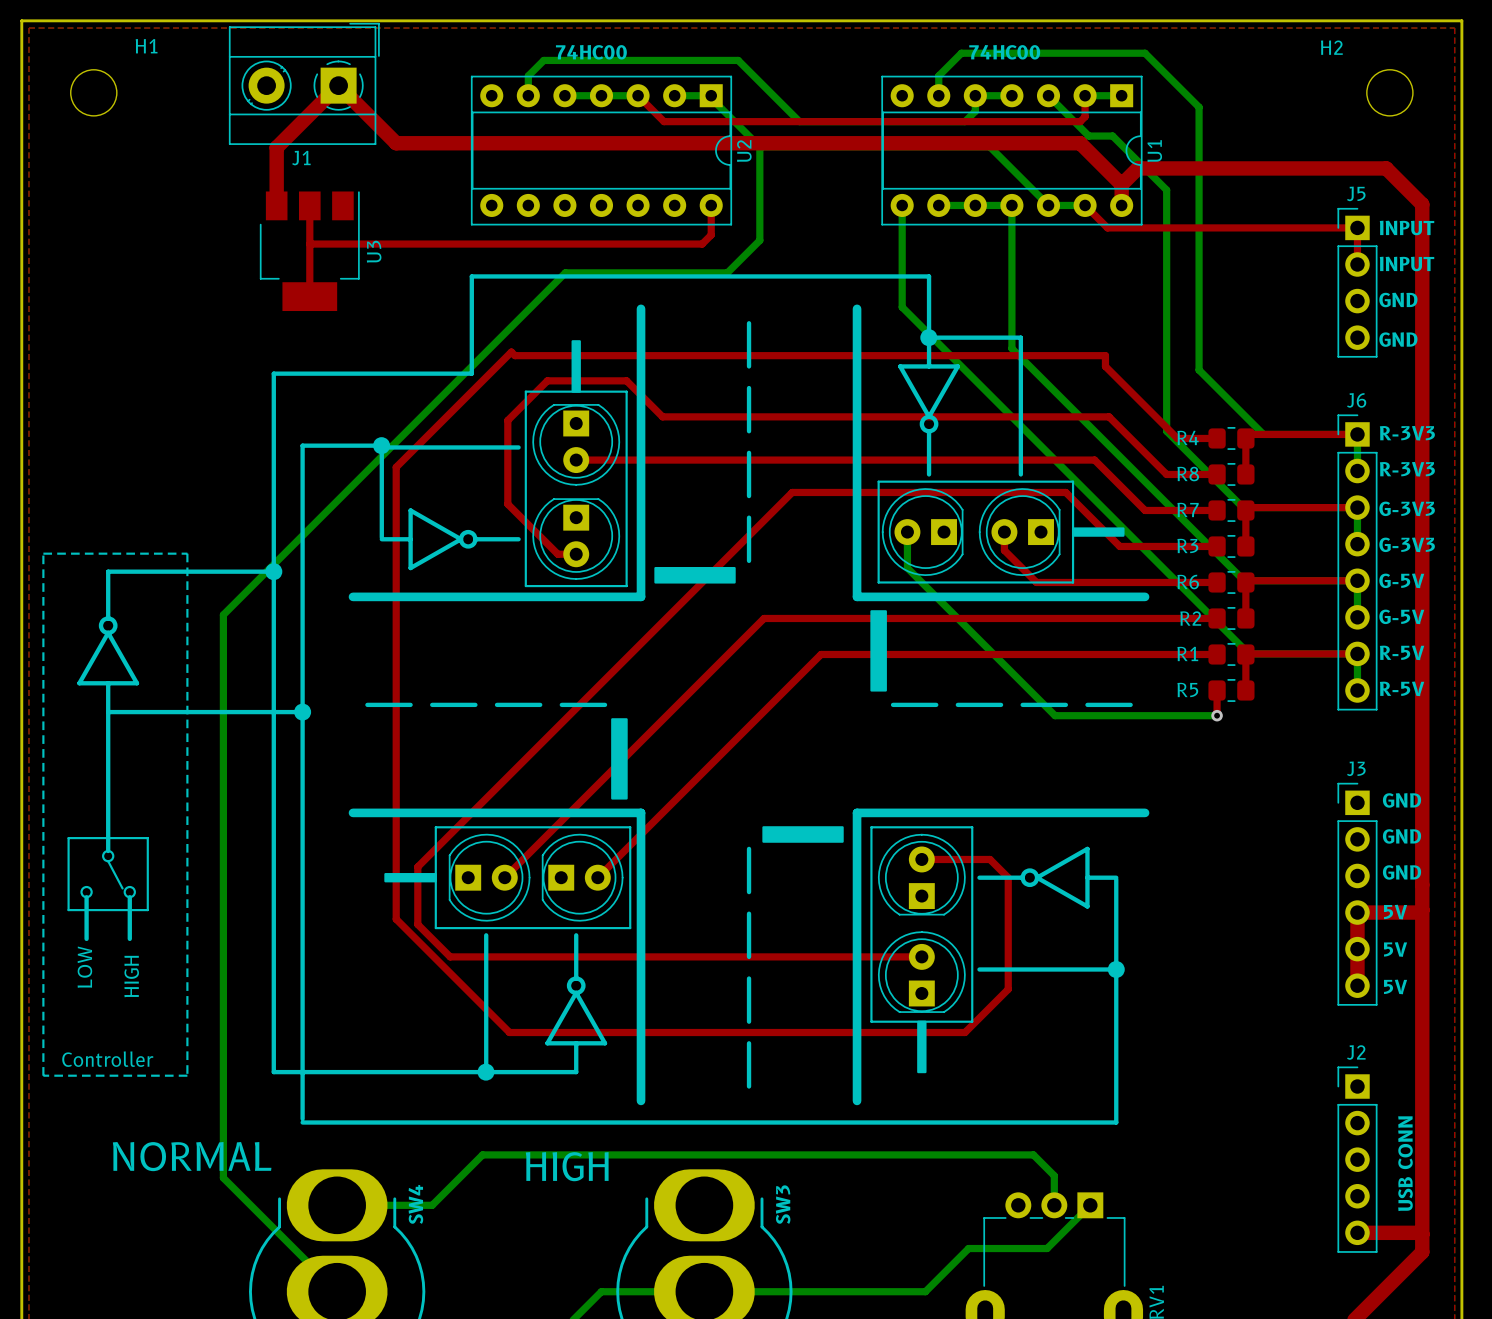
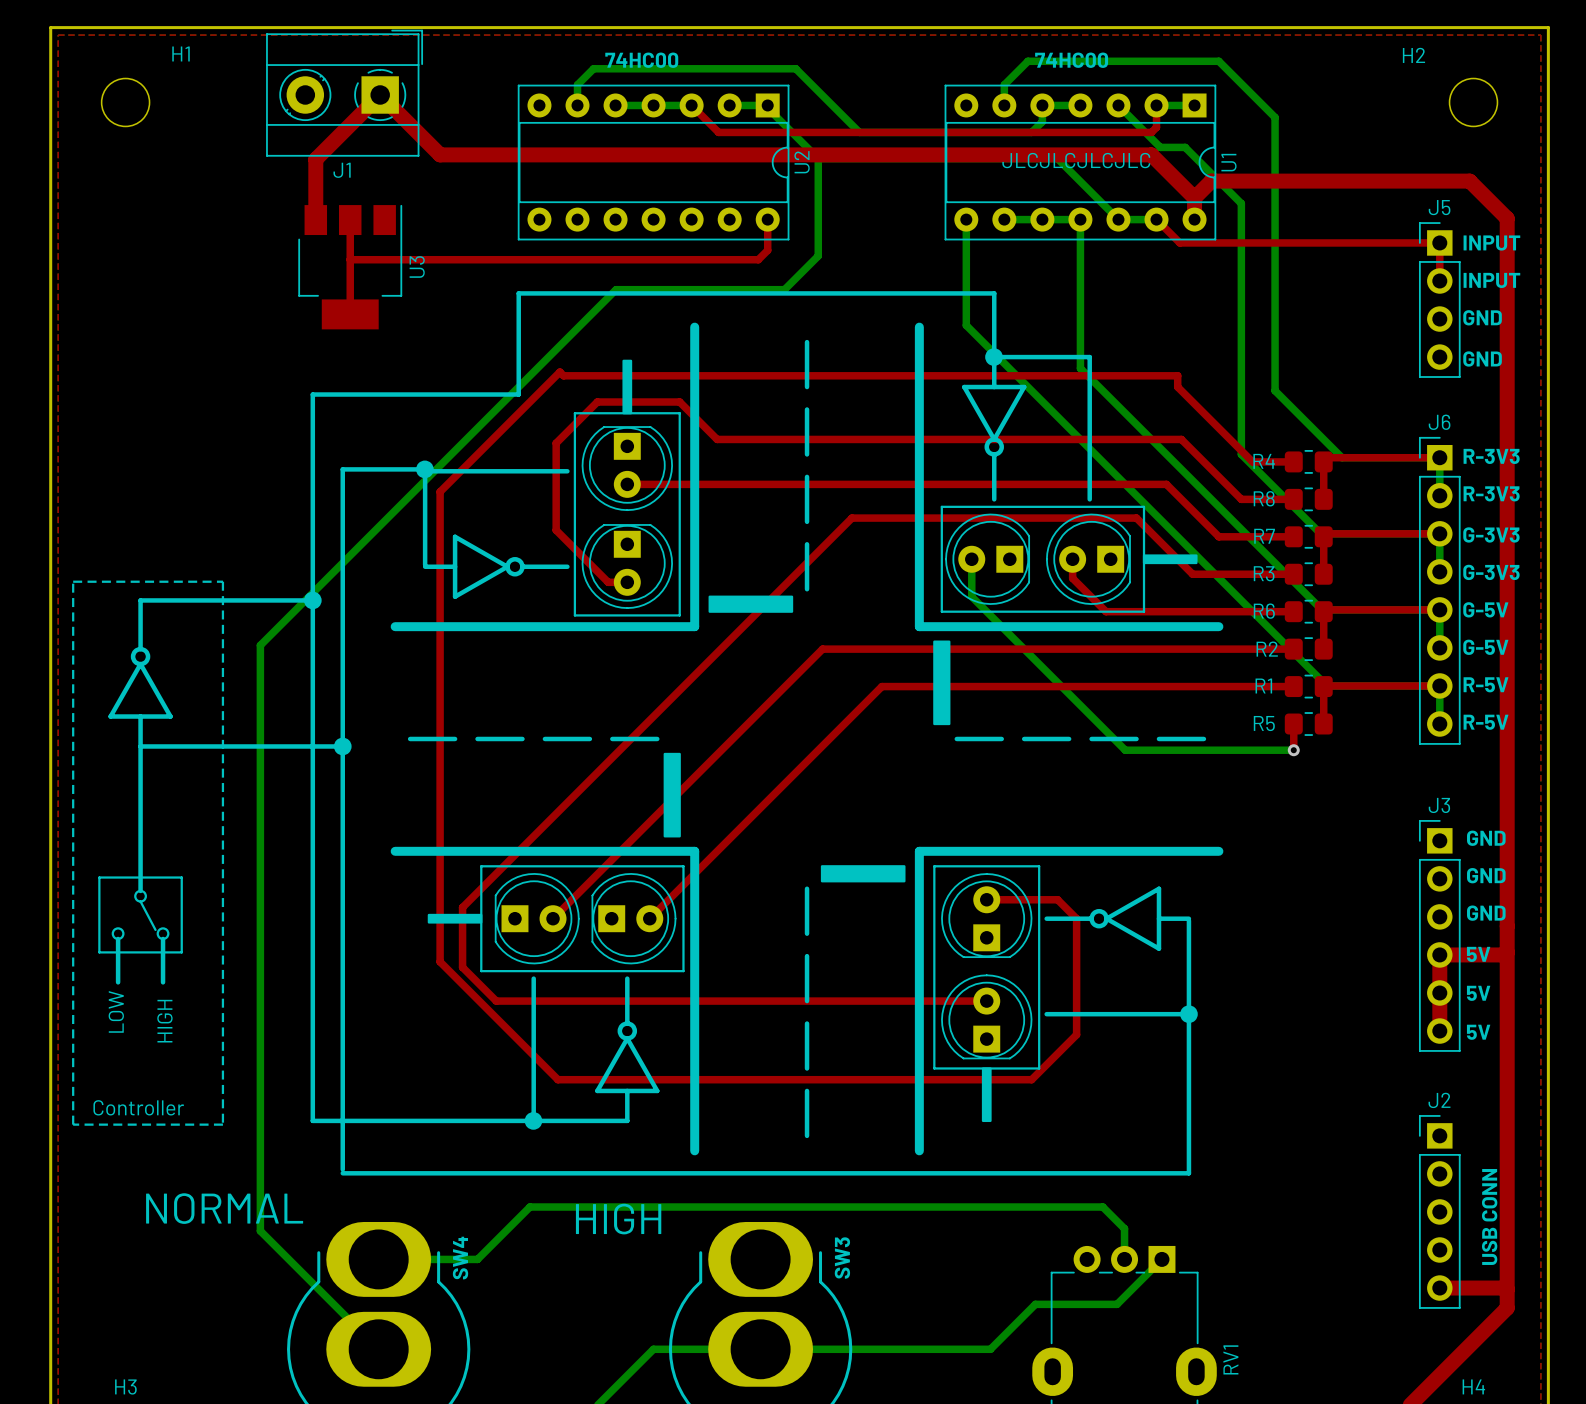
text: none -> JLCJLCJLCJLC (1076, 160)

